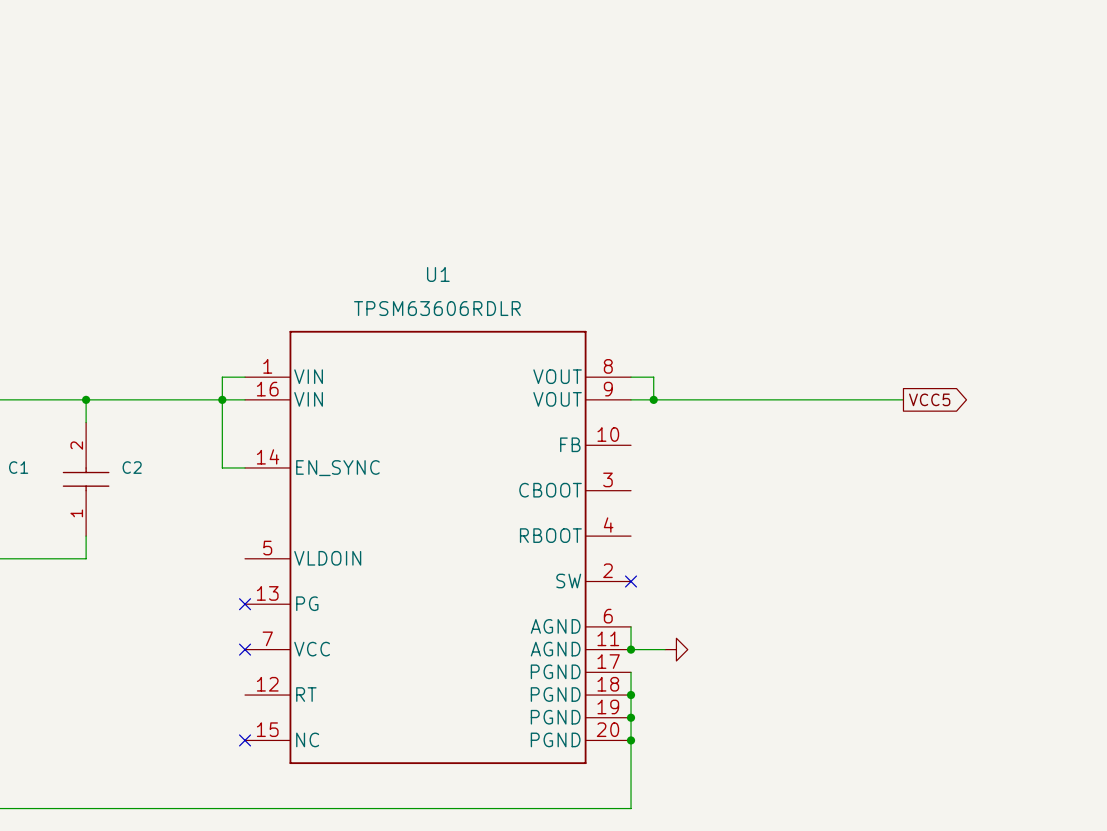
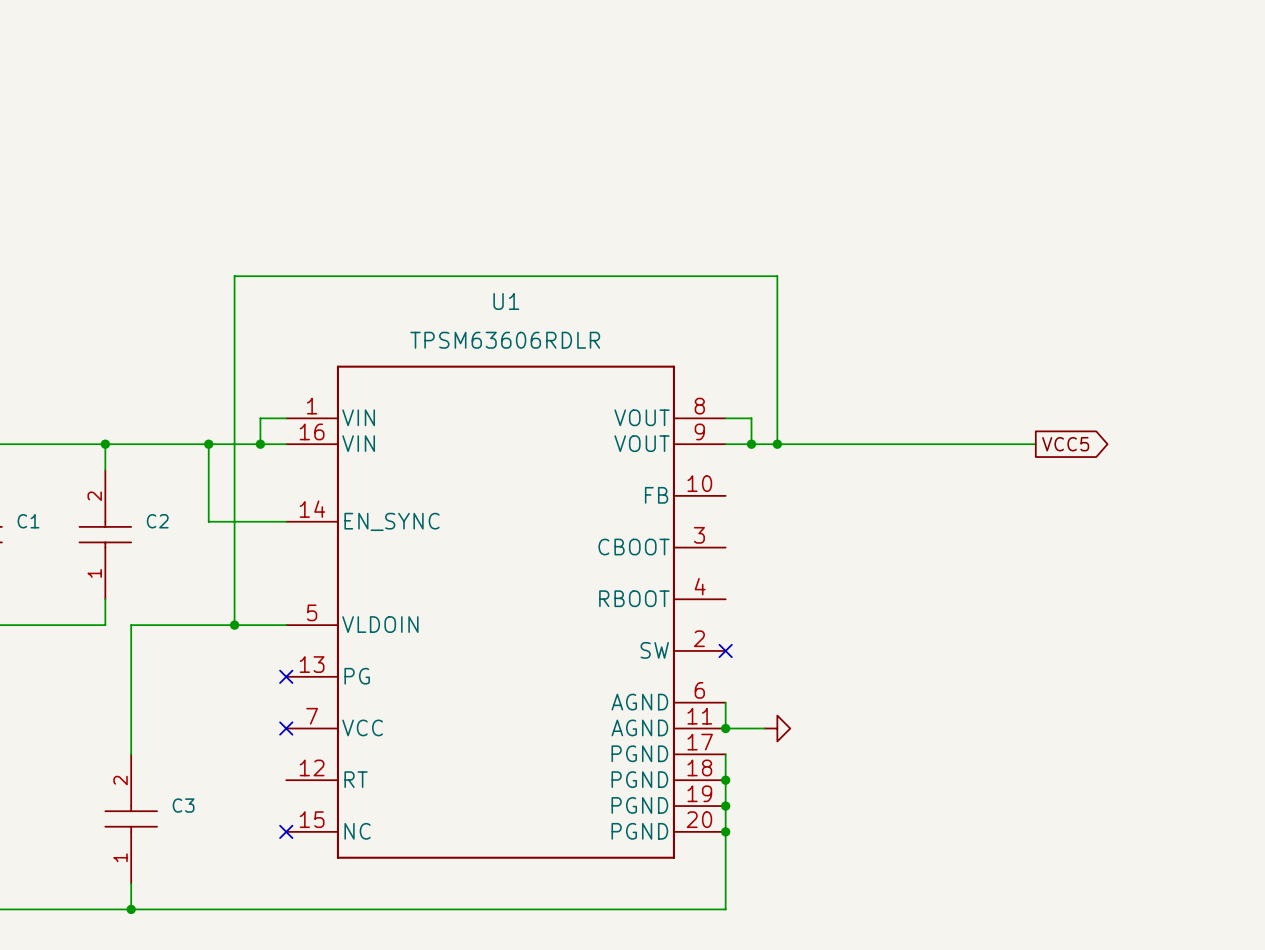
junction: none -> (208, 444)
wire: (222, 399) (222, 467) -> (208, 444) (208, 521) (260, 521)
wire: none -> (777, 444) (777, 276) (234, 276) (234, 625)
junction: none -> (777, 444)
junction: none -> (234, 625)
wire: none -> (286, 625) (131, 625) (131, 754)
C3: none -> (131, 818)
wire: none -> (131, 883) (131, 909)
junction: none -> (131, 909)

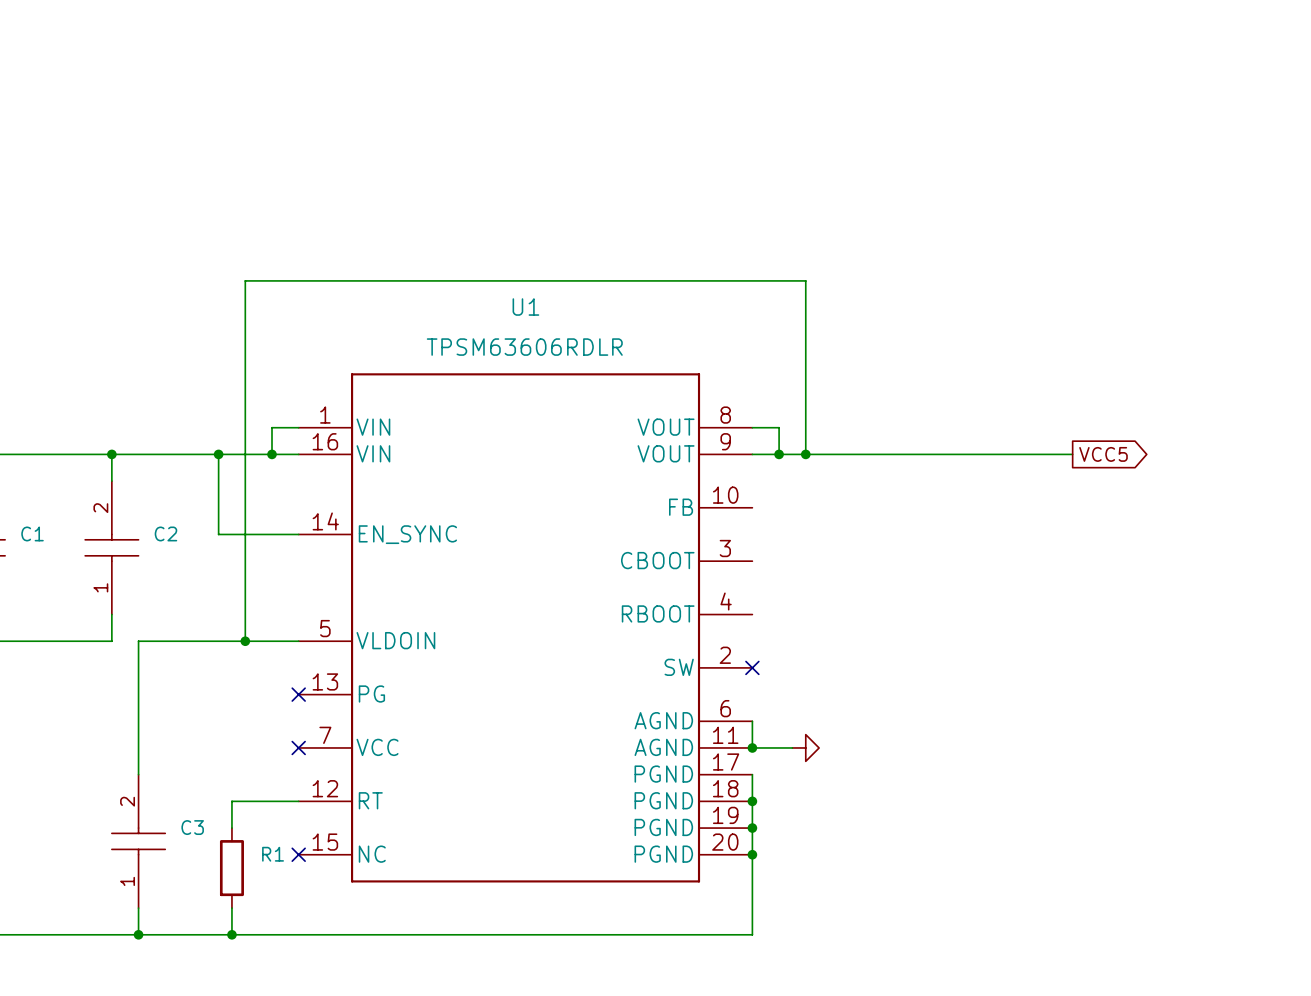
wire: none -> (298, 801) (231, 801) (231, 828)
R1: none -> (231, 868)
wire: none -> (231, 908) (231, 934)
junction: none -> (231, 934)

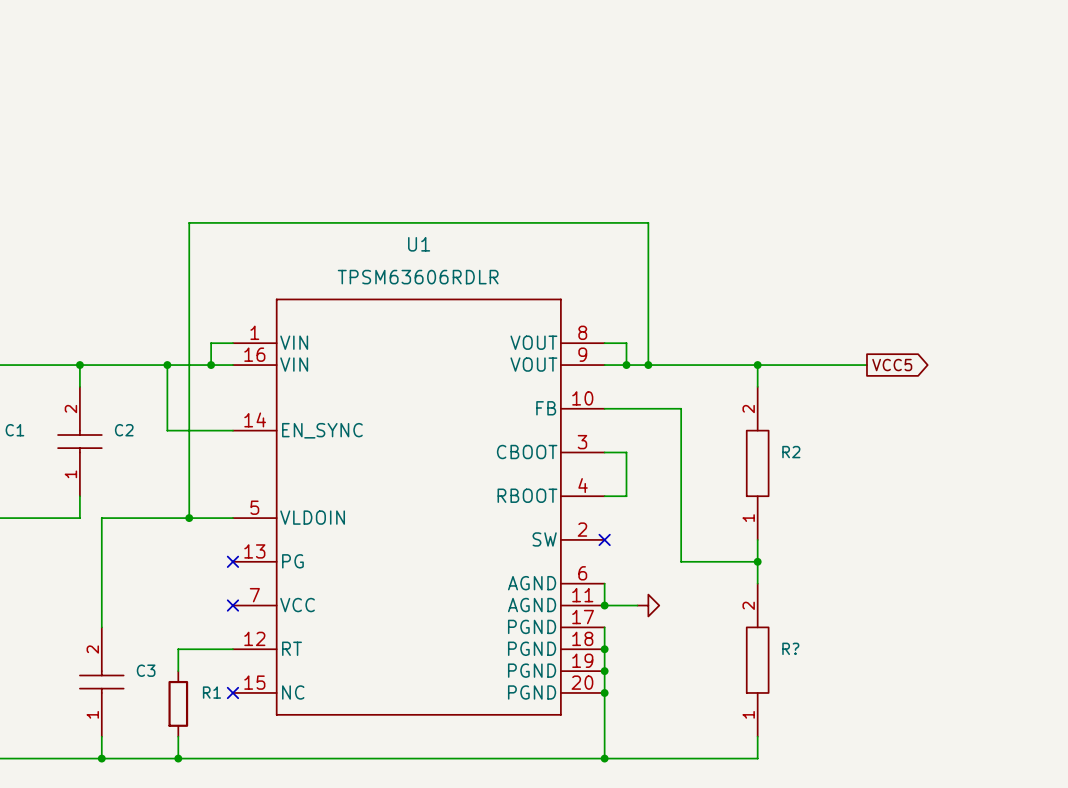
wire: none -> (757, 365) (757, 386)
junction: none -> (757, 365)
wire: none -> (604, 408) (681, 408) (681, 561) (757, 561)
wire: none -> (604, 452) (626, 452) (626, 496) (604, 496)
R2: none -> (757, 463)
wire: none -> (757, 539) (757, 583)
junction: none -> (757, 561)
R?: none -> (757, 660)
wire: none -> (757, 736) (757, 758) (604, 758)
junction: none -> (604, 758)

